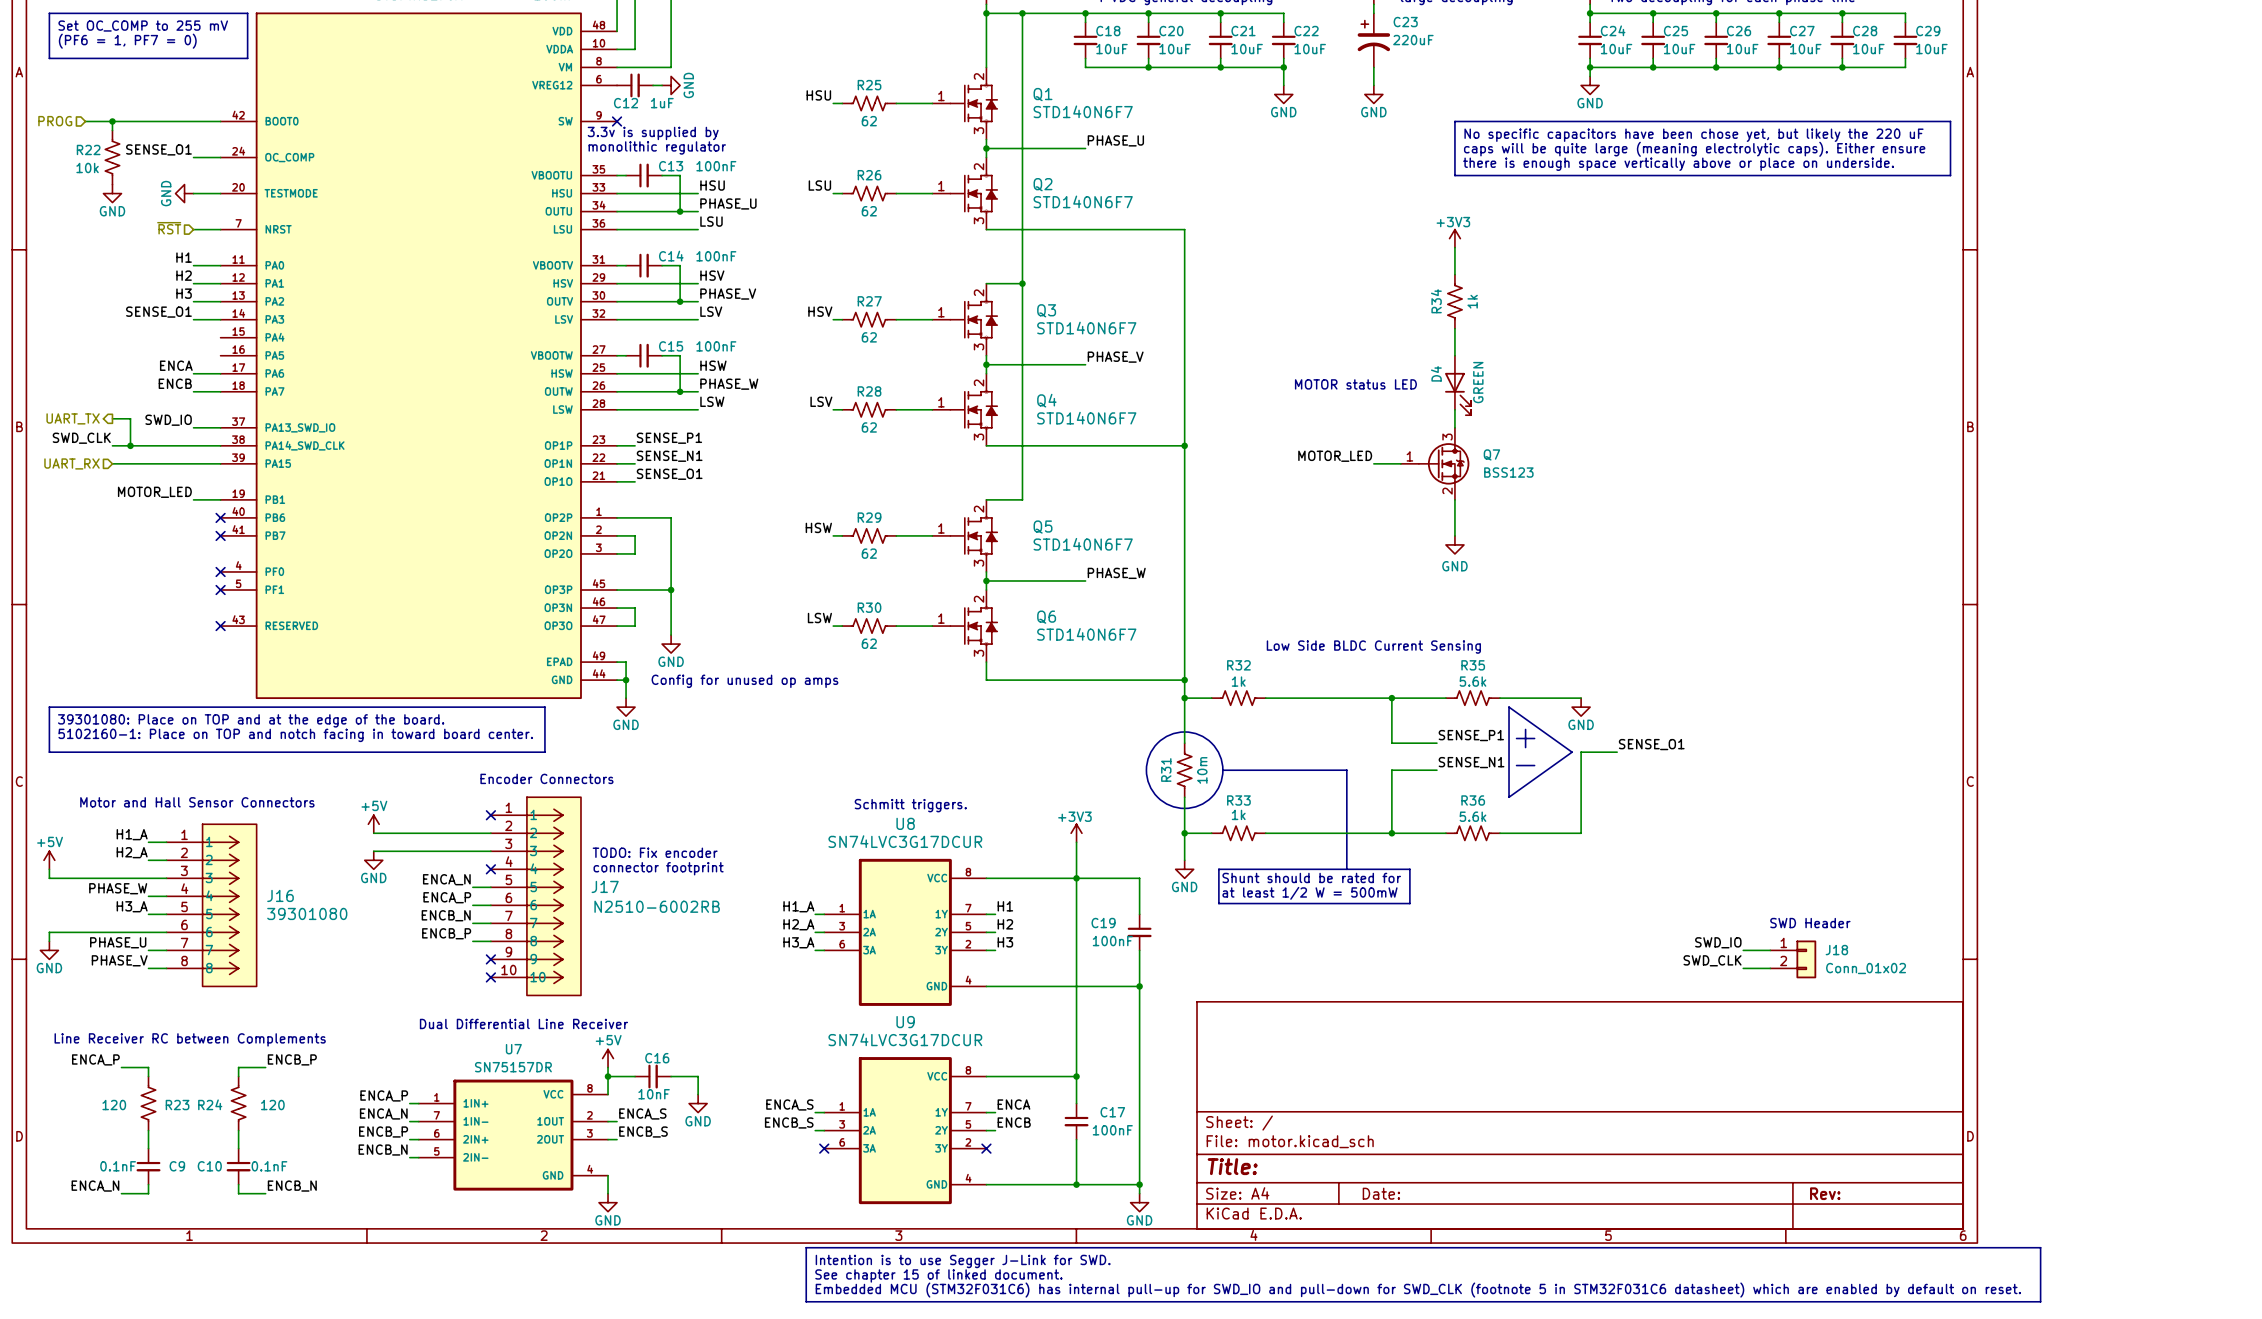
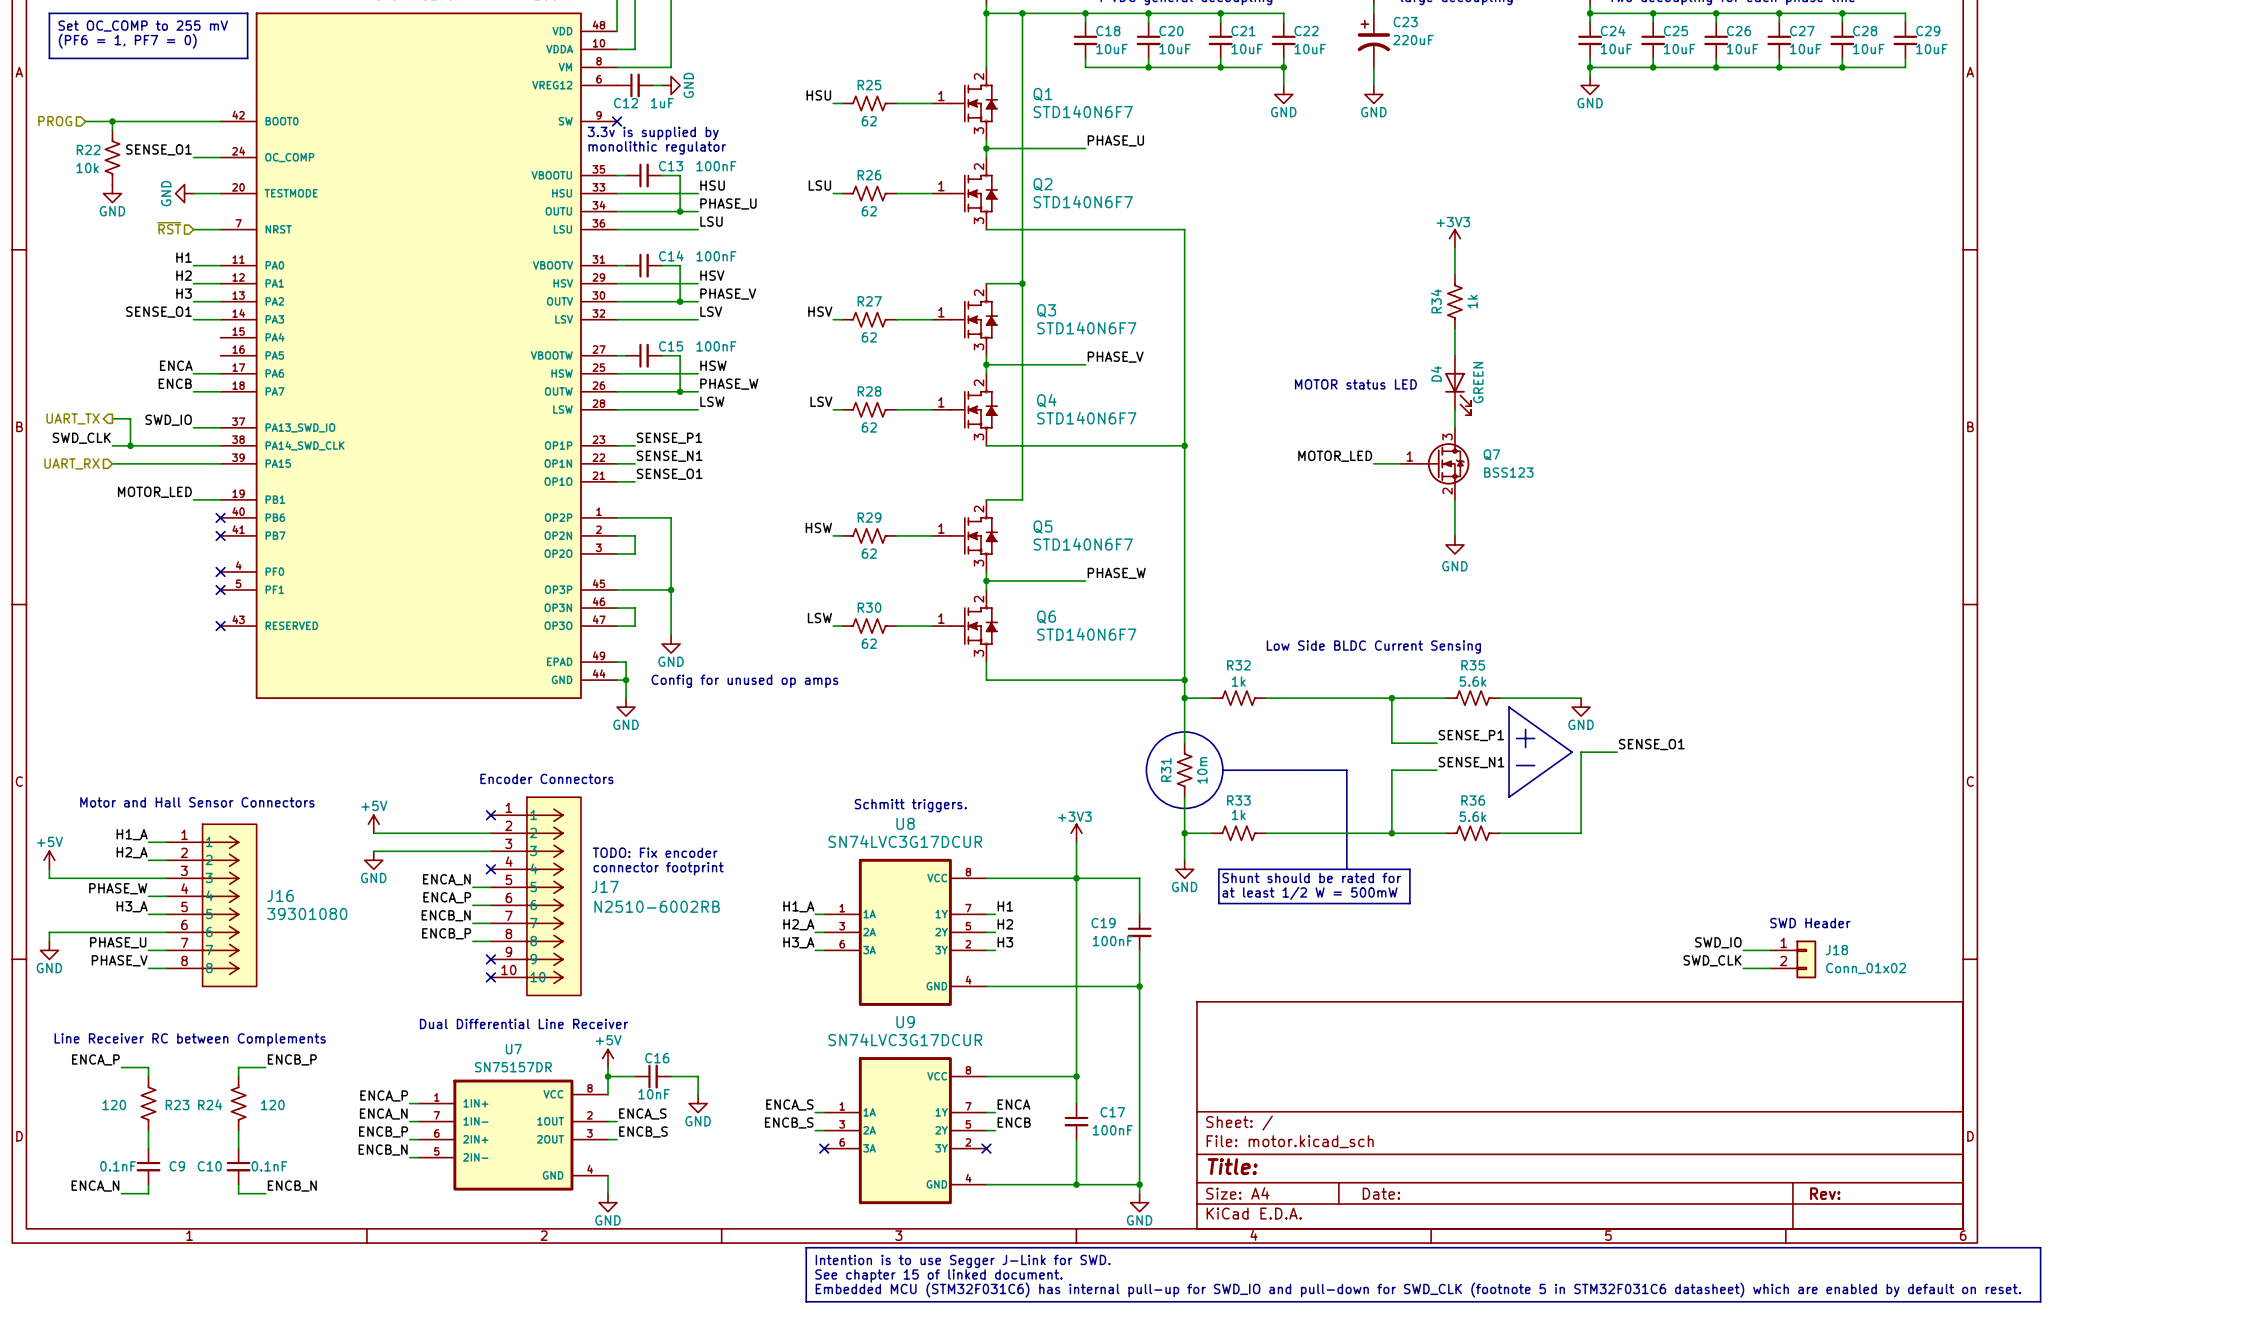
line: (1454, 121) (1950, 121) (1950, 175) (1454, 175) (1454, 121) -> none
text: No specific capacitors have been chose yet, but likely the 220 uF (1694, 135) -> none
text: caps will be quite large (meaning electrolytic caps). Either ensure (1694, 149) -> none
text: there is enough space vertically above or place on underside. (1678, 164) -> none
line: (49, 707) (544, 707) (544, 752) (49, 752) (49, 707) -> none
text: 39301080: Place on TOP and at the edge of the board. (251, 720) -> none
text: 5102160-1: Place on TOP and notch facing in toward board center. (295, 735) -> none

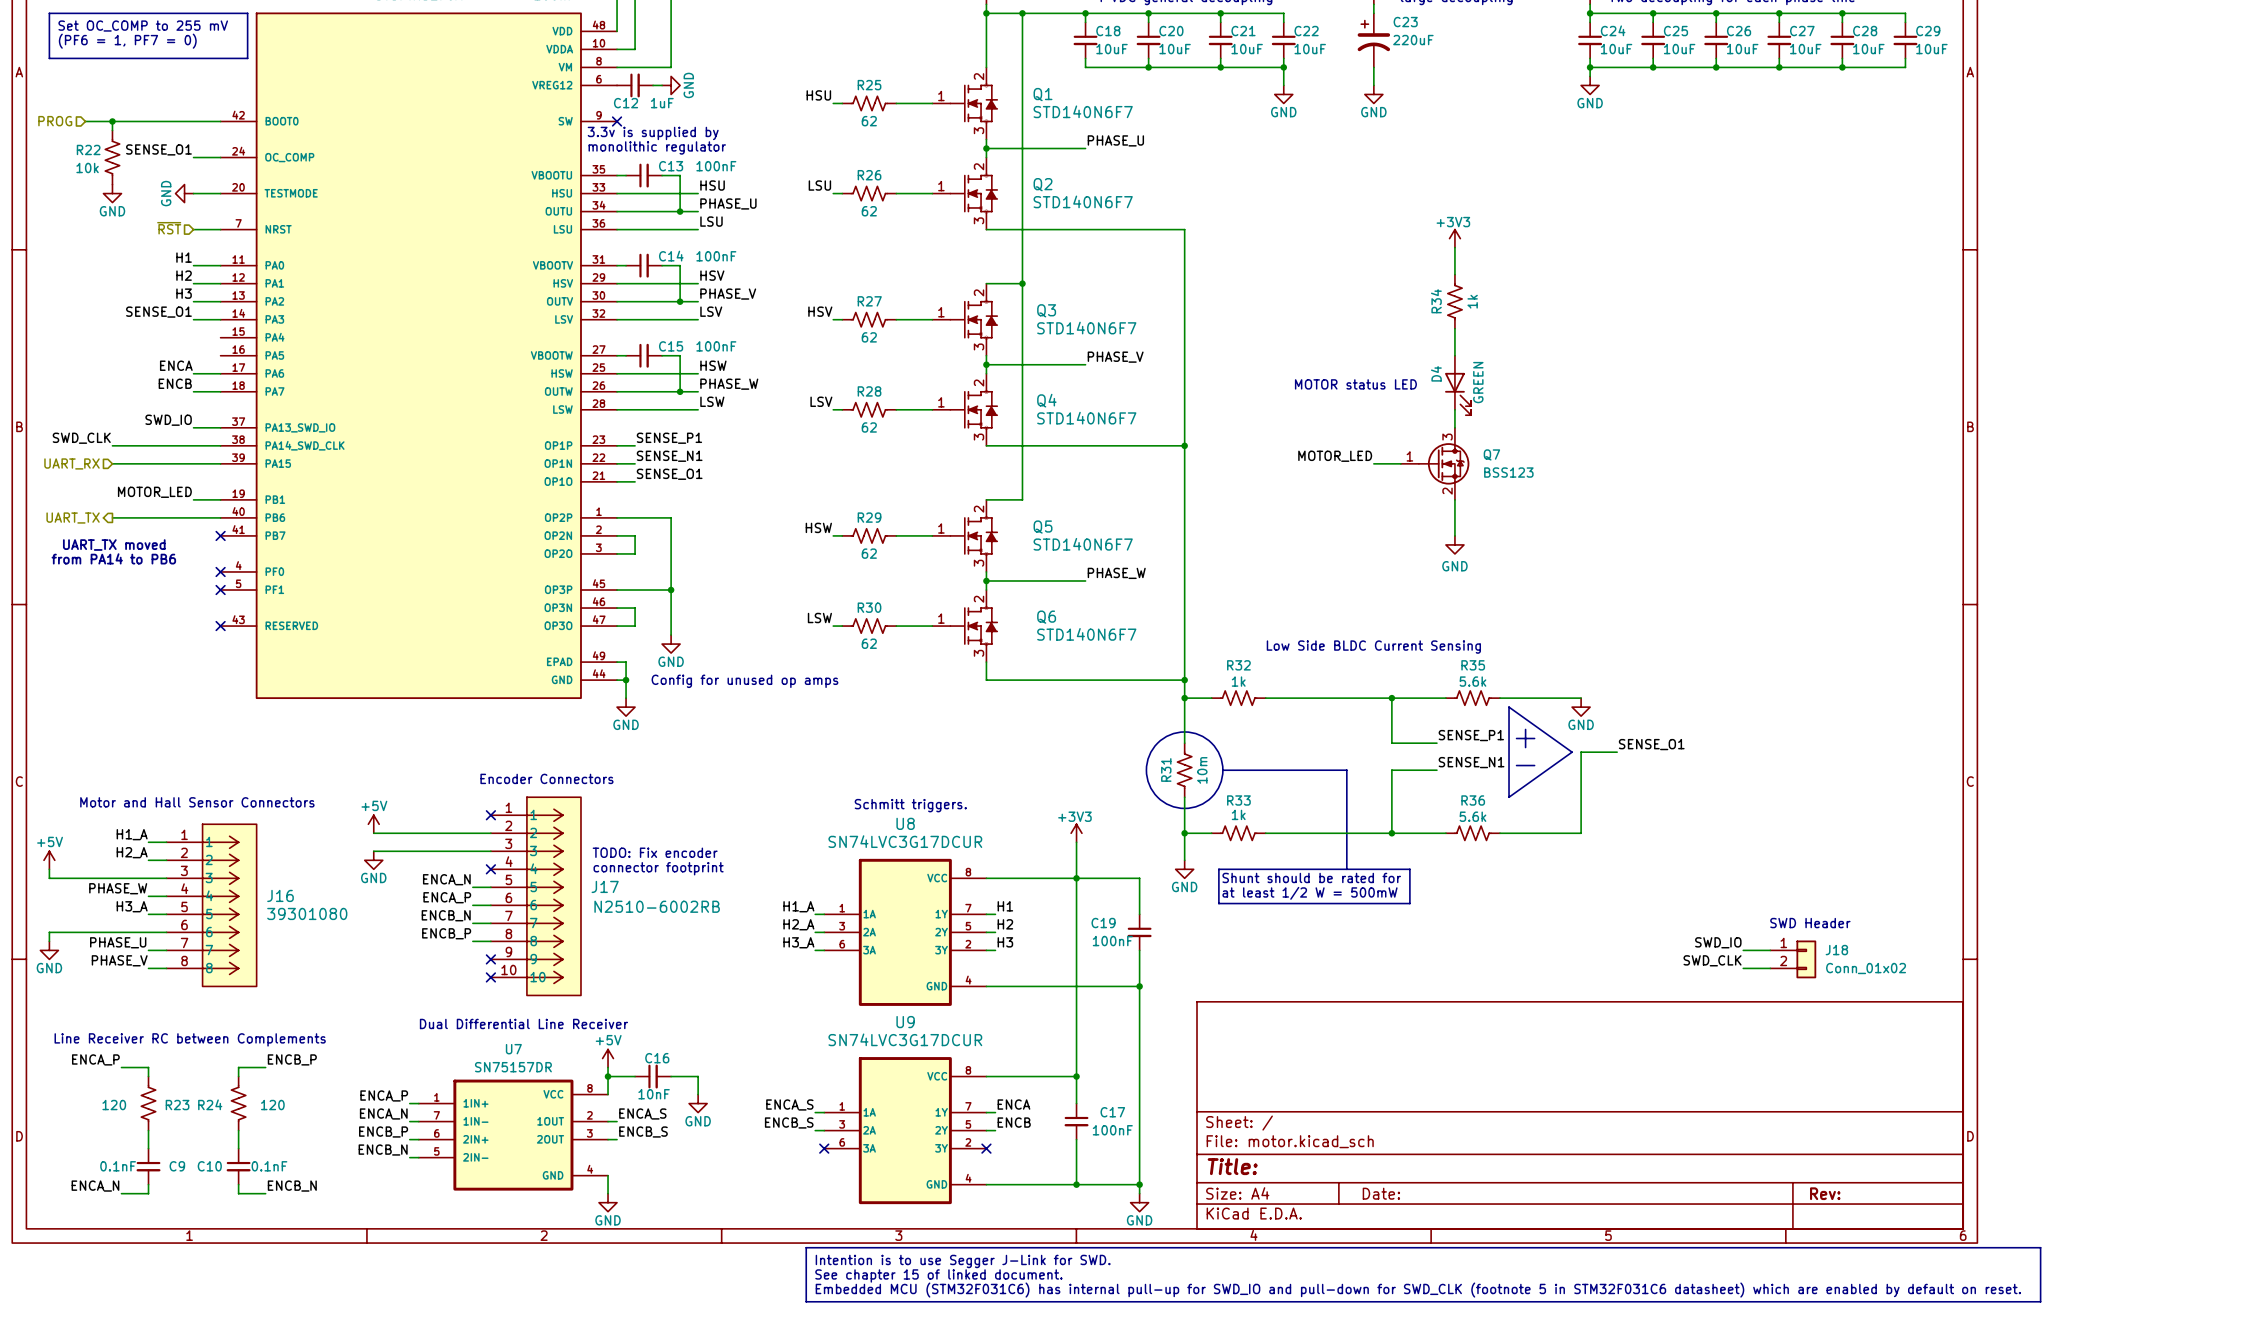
hierarchical label position: UART_TX (73, 418) -> UART_TX (73, 518)
wire: (112, 418) (130, 418) (130, 445) -> none
junction: (130, 445) -> none
wire: none -> (112, 517) (220, 517)
no-connect mark: (220, 517) -> none
text: none -> UART_TX moved (114, 545)
text: none -> from PA14 to PB6 (113, 558)

